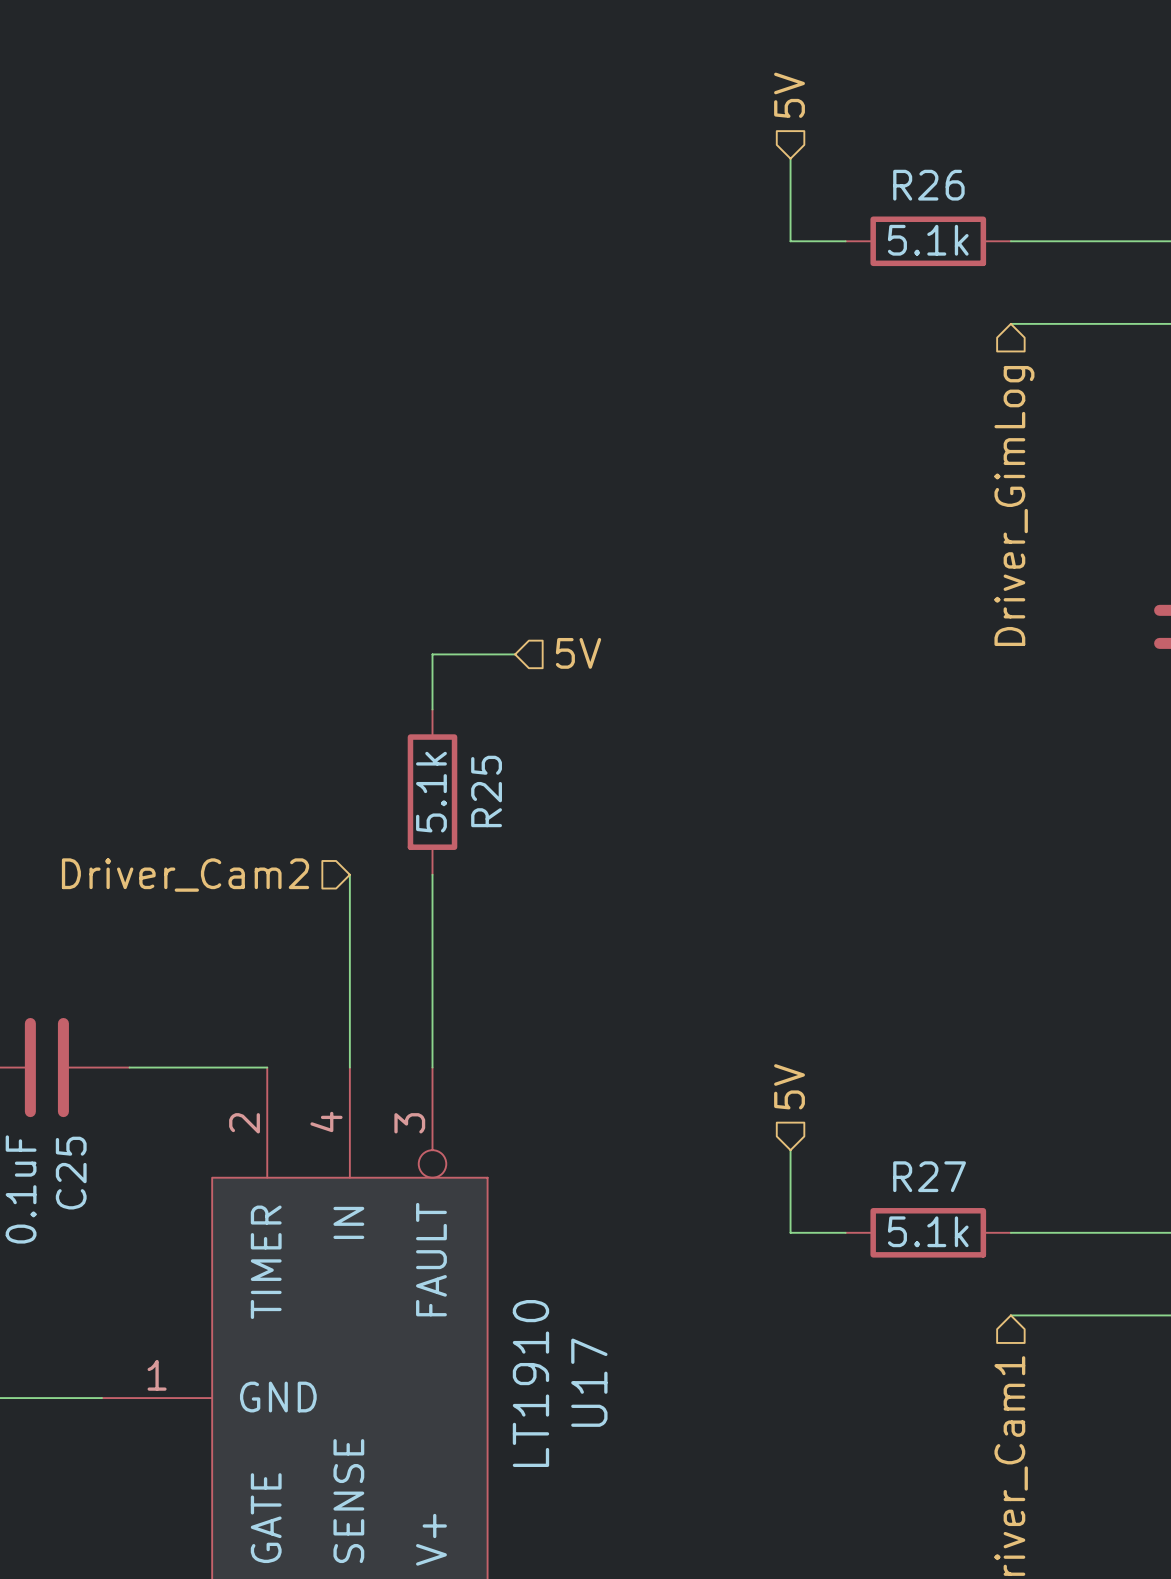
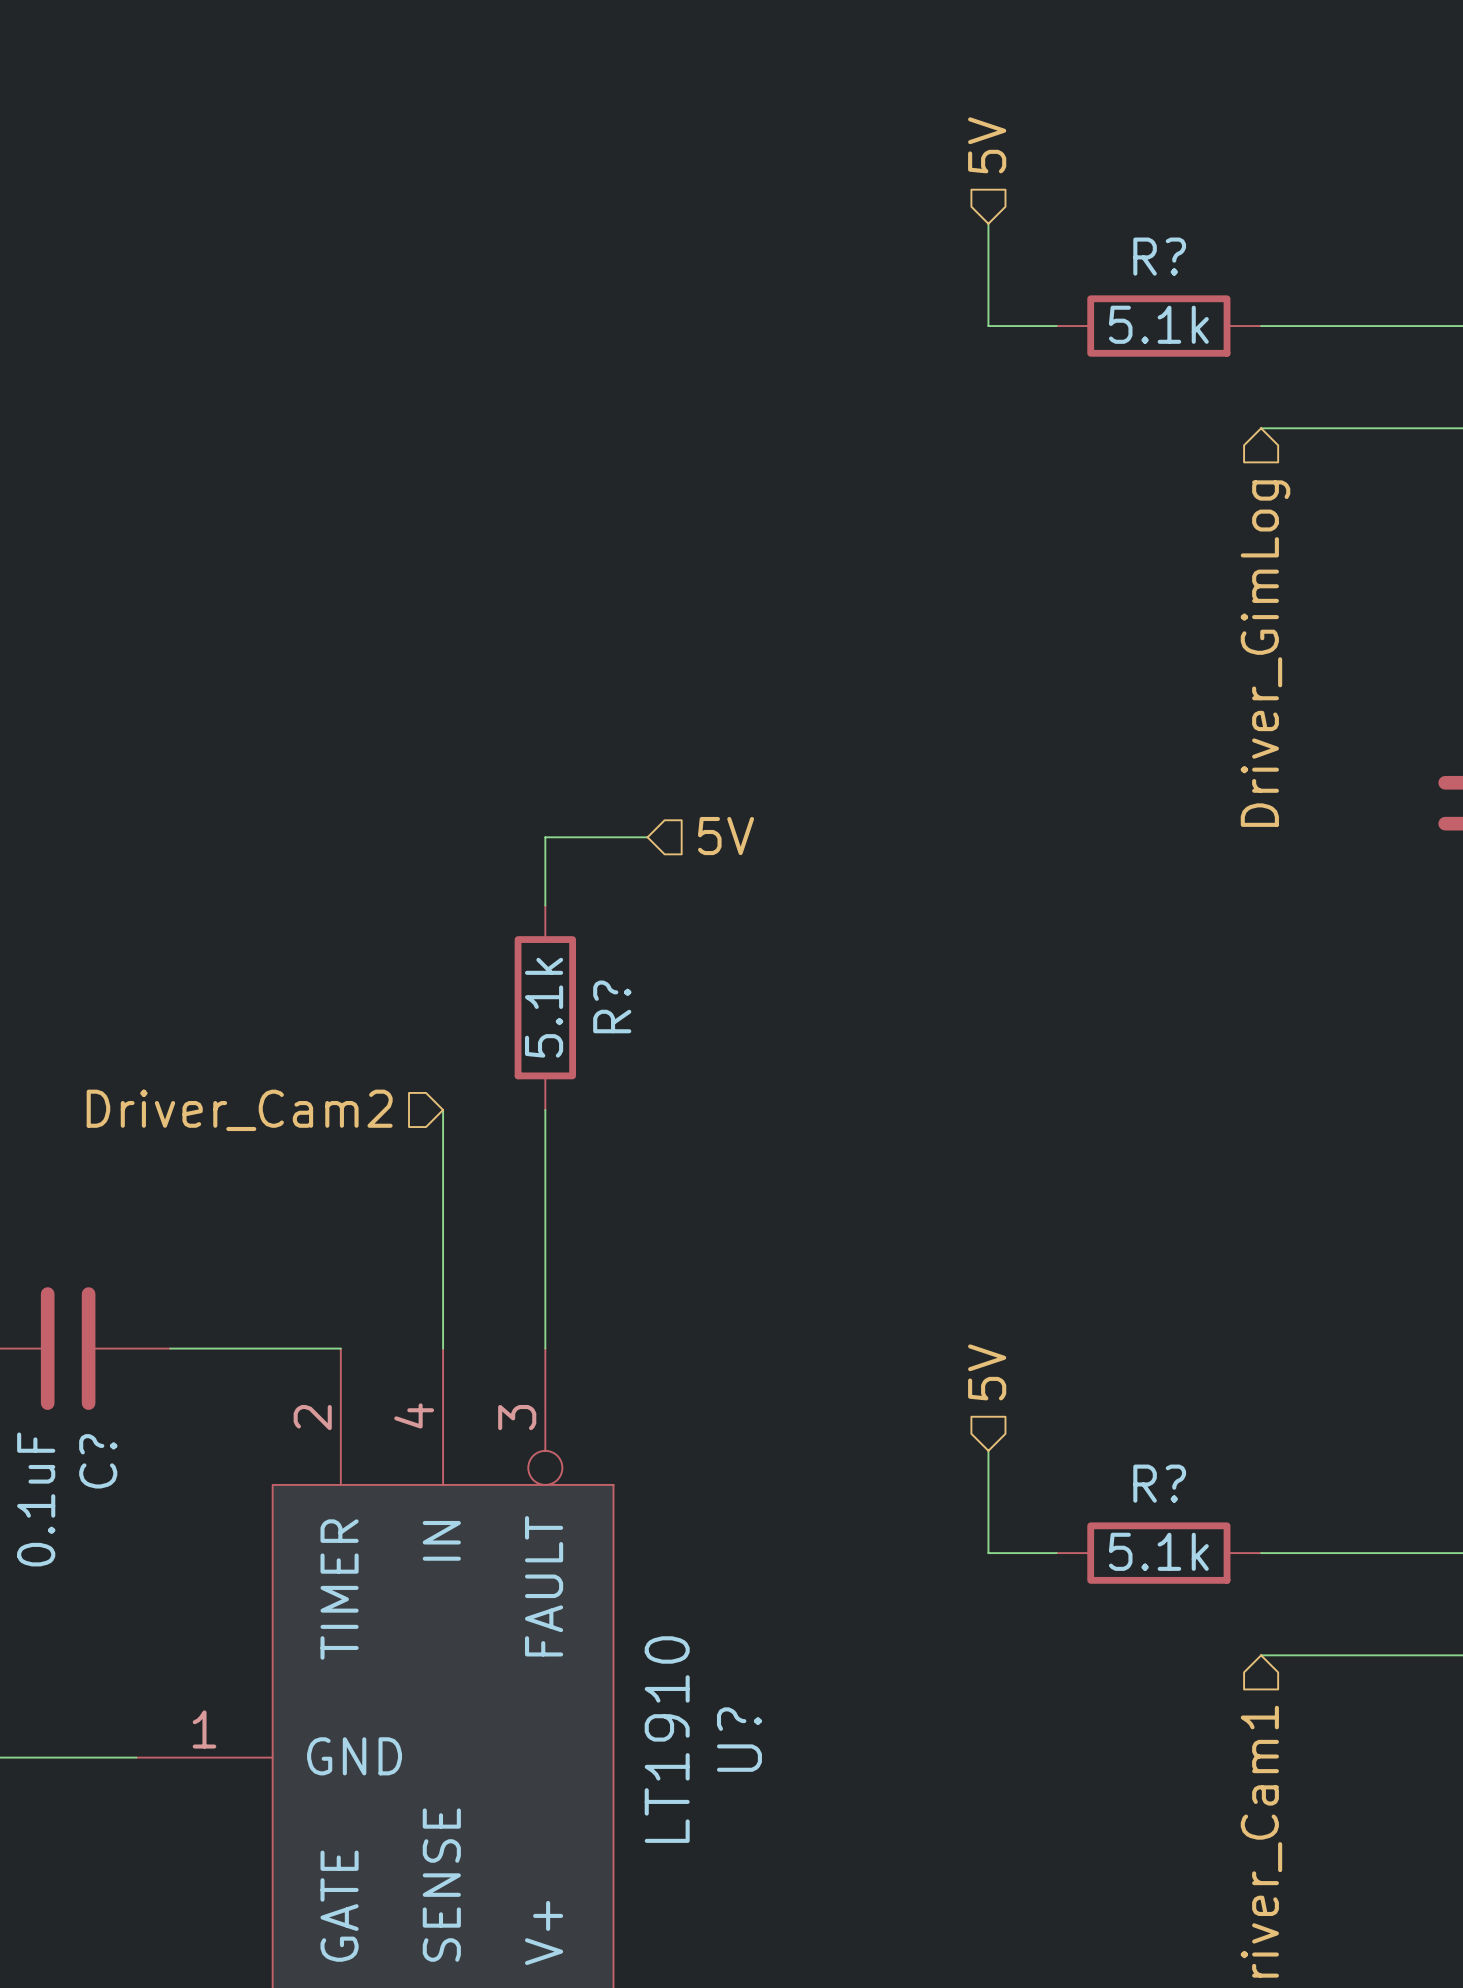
R26 name: R26 (928, 185) -> R? (1159, 256)
R25 name: R25 (486, 791) -> R? (612, 1006)
C25 name: C25 (71, 1173) -> C? (98, 1461)
R27 name: R27 (929, 1176) -> R? (1159, 1483)
U17 name: U17 (589, 1382) -> U? (739, 1739)

